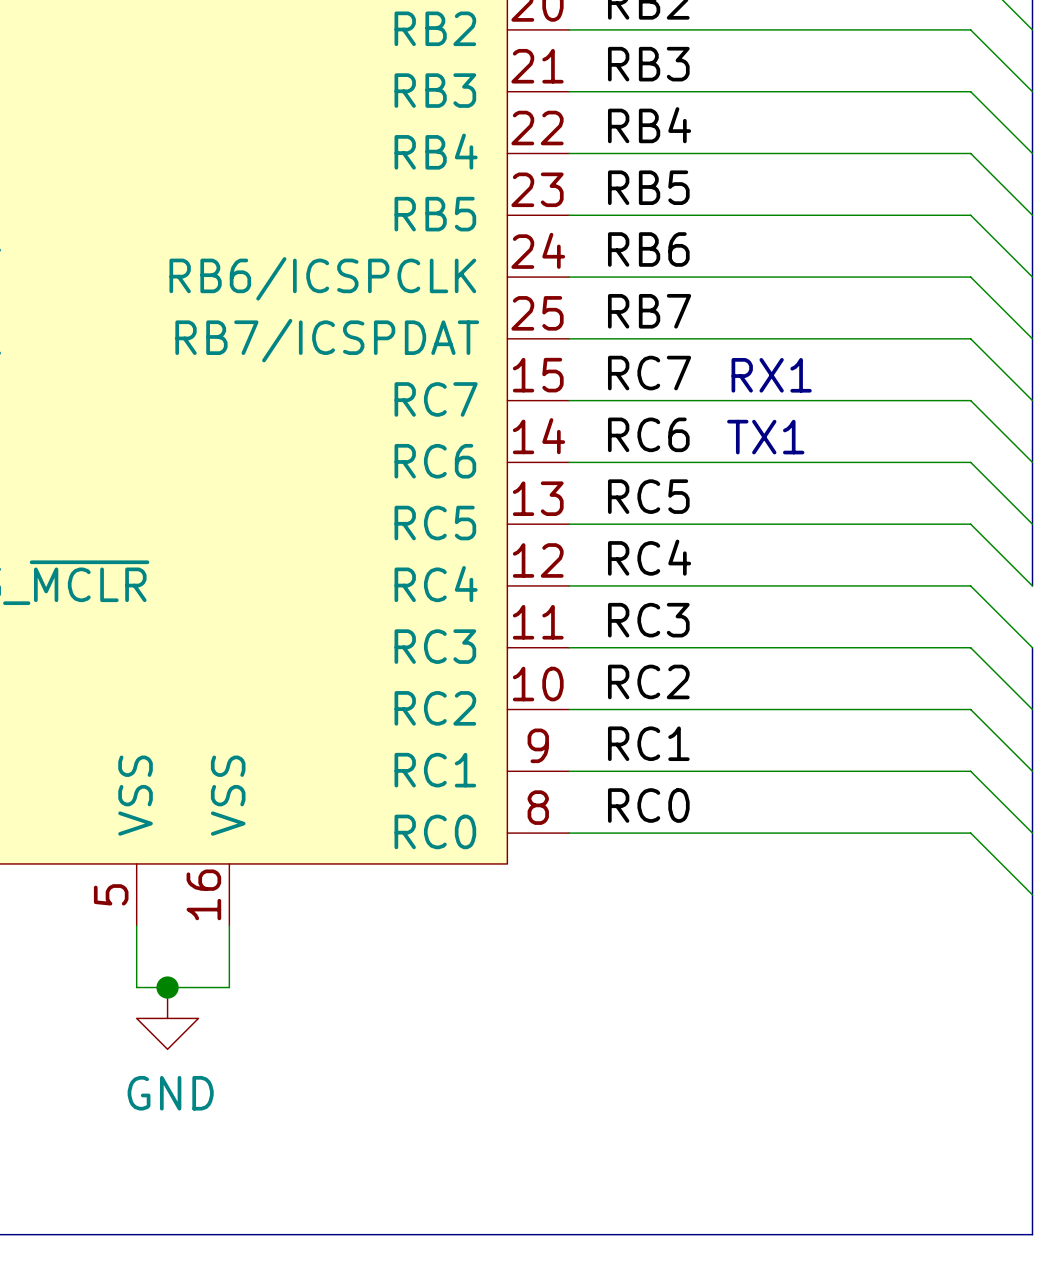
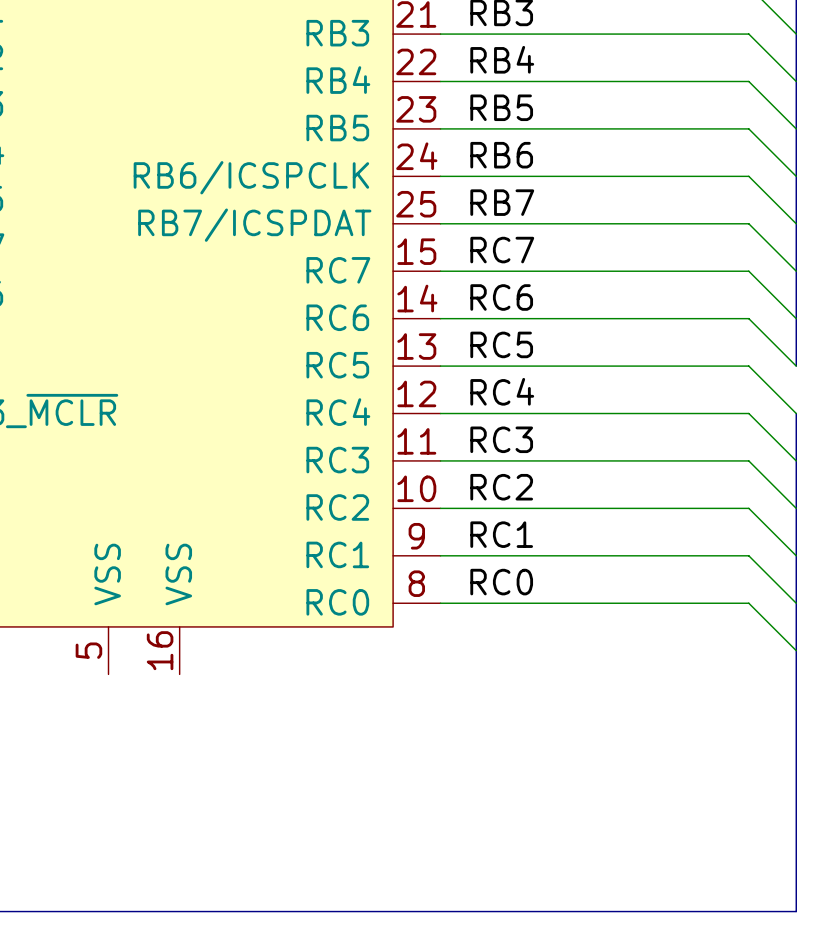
text: RX1 (771, 375) -> none
text: TX1 (765, 437) -> none
bus: (1032, 524) (1032, 585) -> (796, 460) (796, 413)
wire: (136, 925) (136, 987) (229, 987) (229, 925) -> none
junction: (167, 987) -> none
power symbol: GND (167, 1018) -> none

